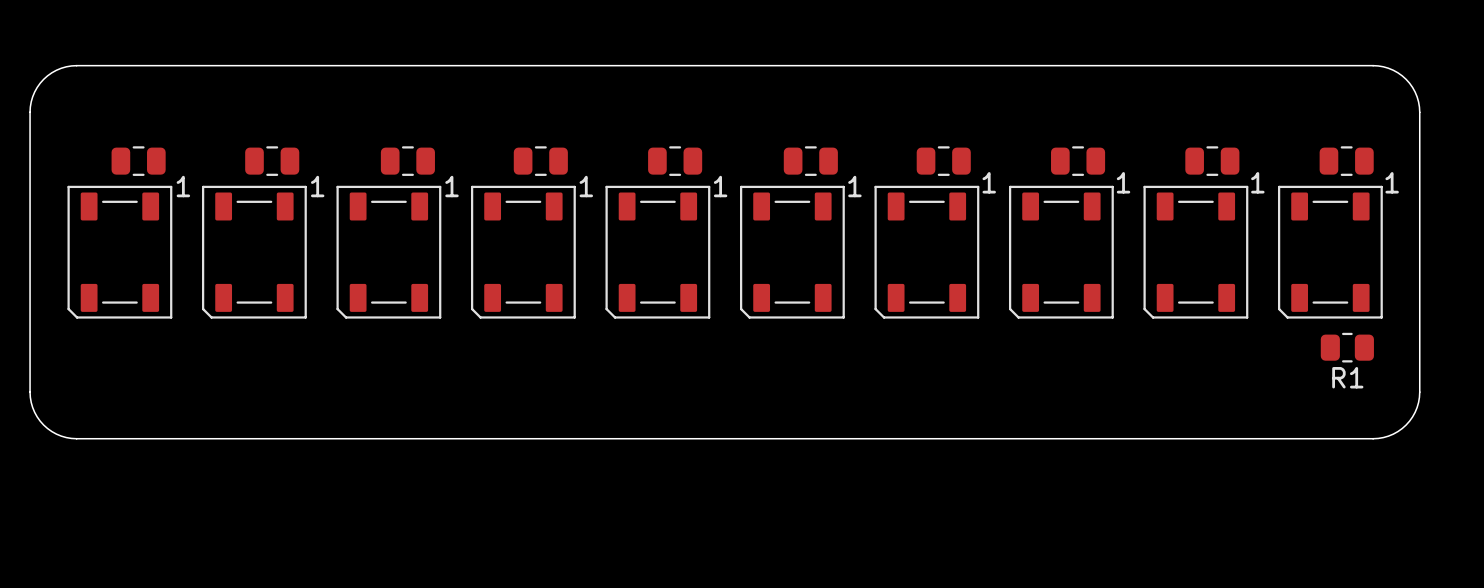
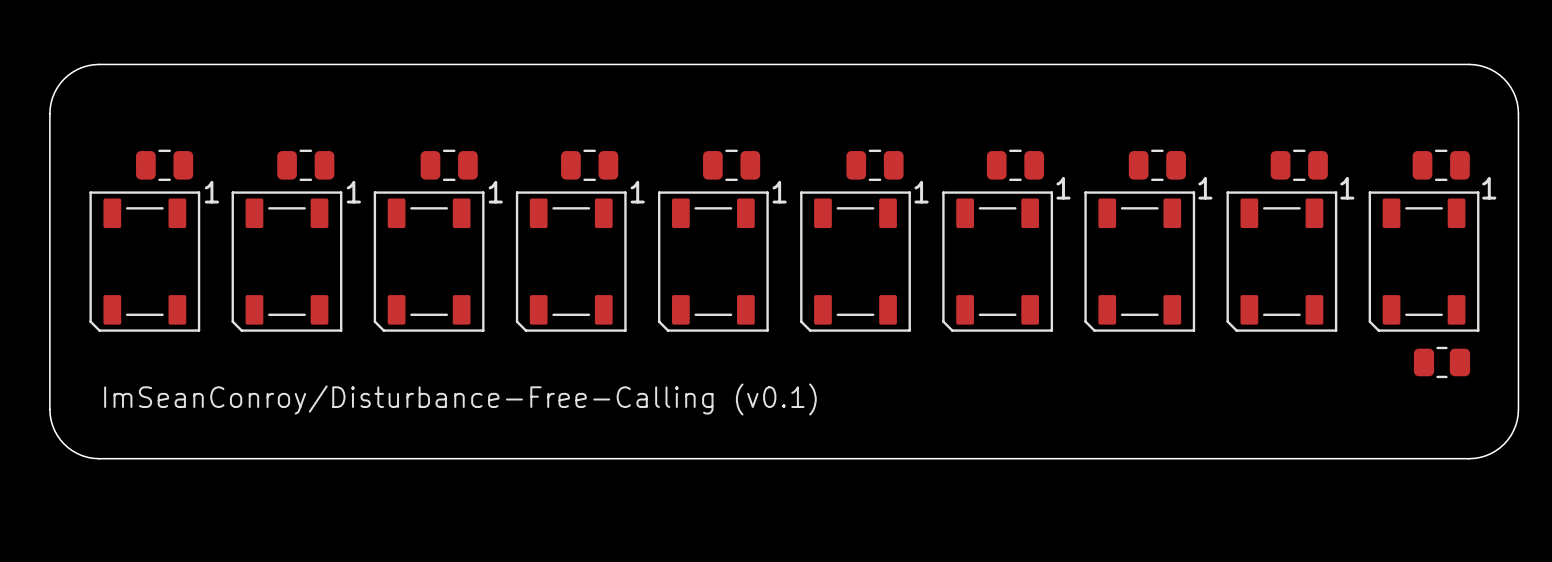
R1 name: R1 (1347, 377) -> none
text: none -> ImSeanConroy/Disturbance-Free-Calling (v0.1) (460, 399)

